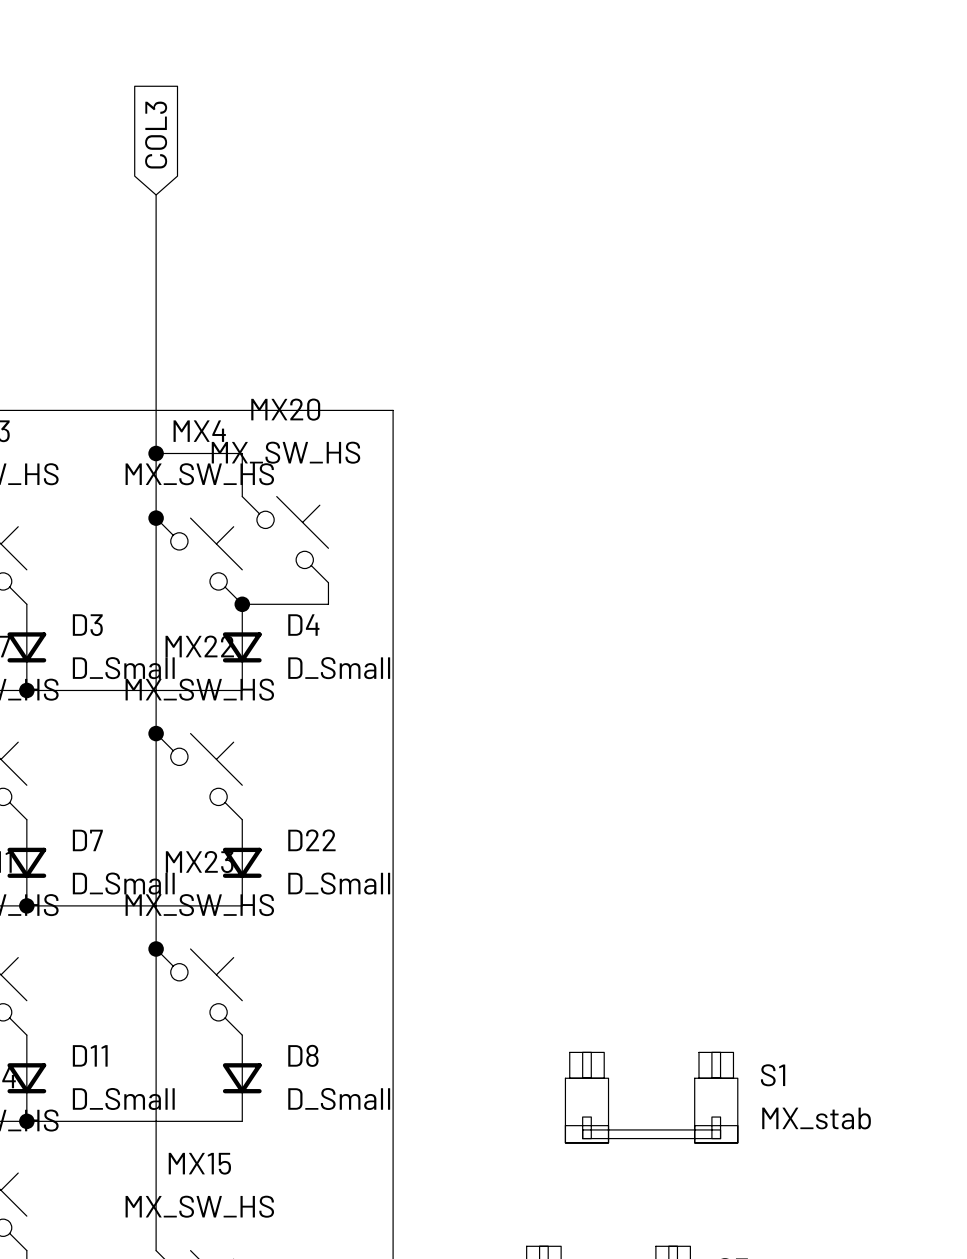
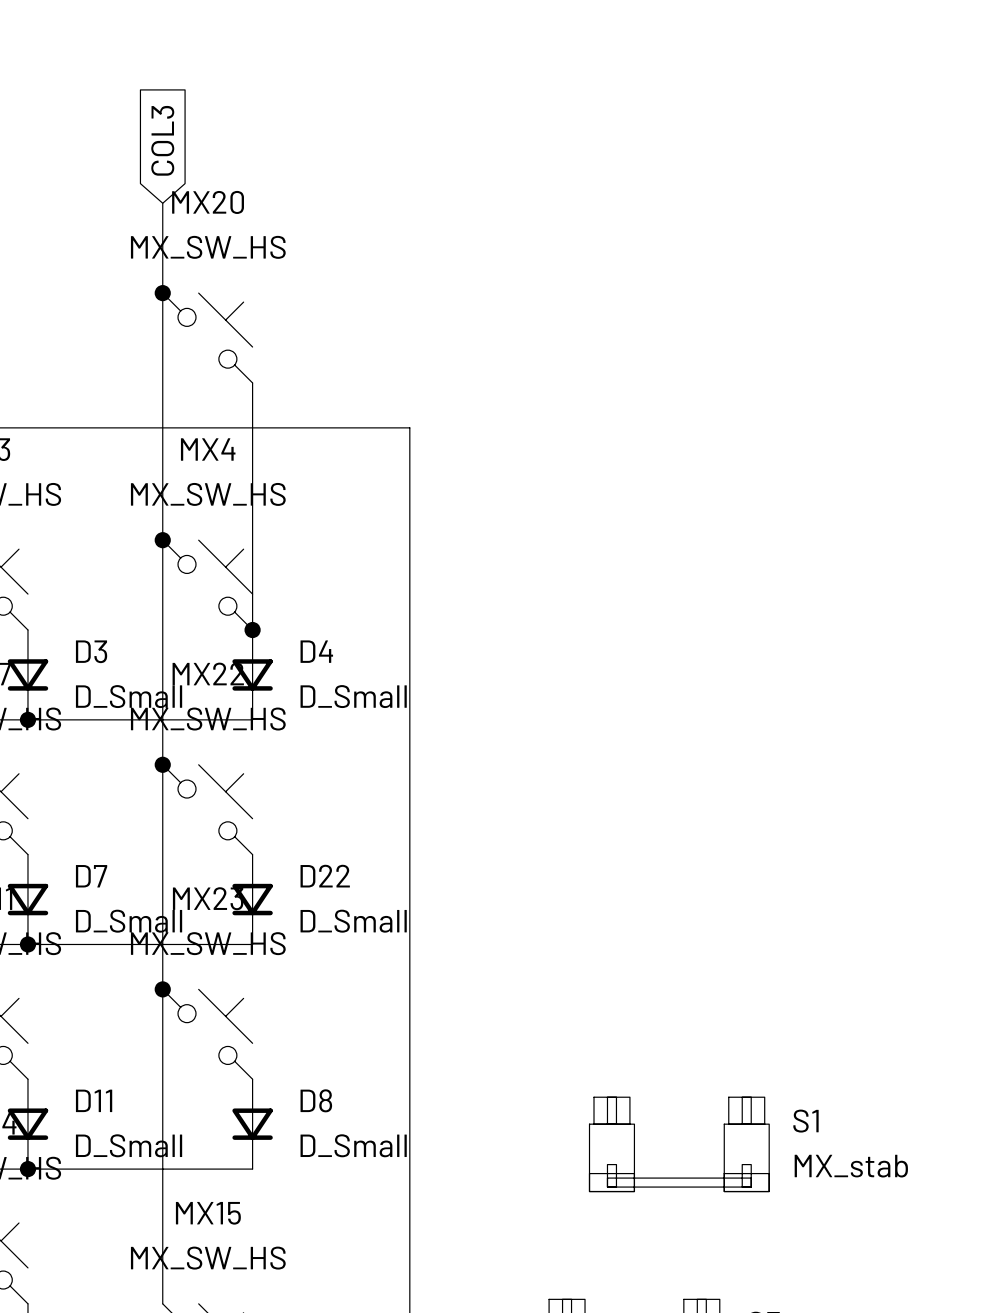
junction: none -> (162, 293)
wire: (156, 453) (242, 453) -> (252, 382) (252, 472)
junction: (156, 453) -> none
MX20 position: (285, 539) -> (207, 338)
wire: (328, 582) (328, 604) (242, 604) -> (252, 517) (252, 630)

